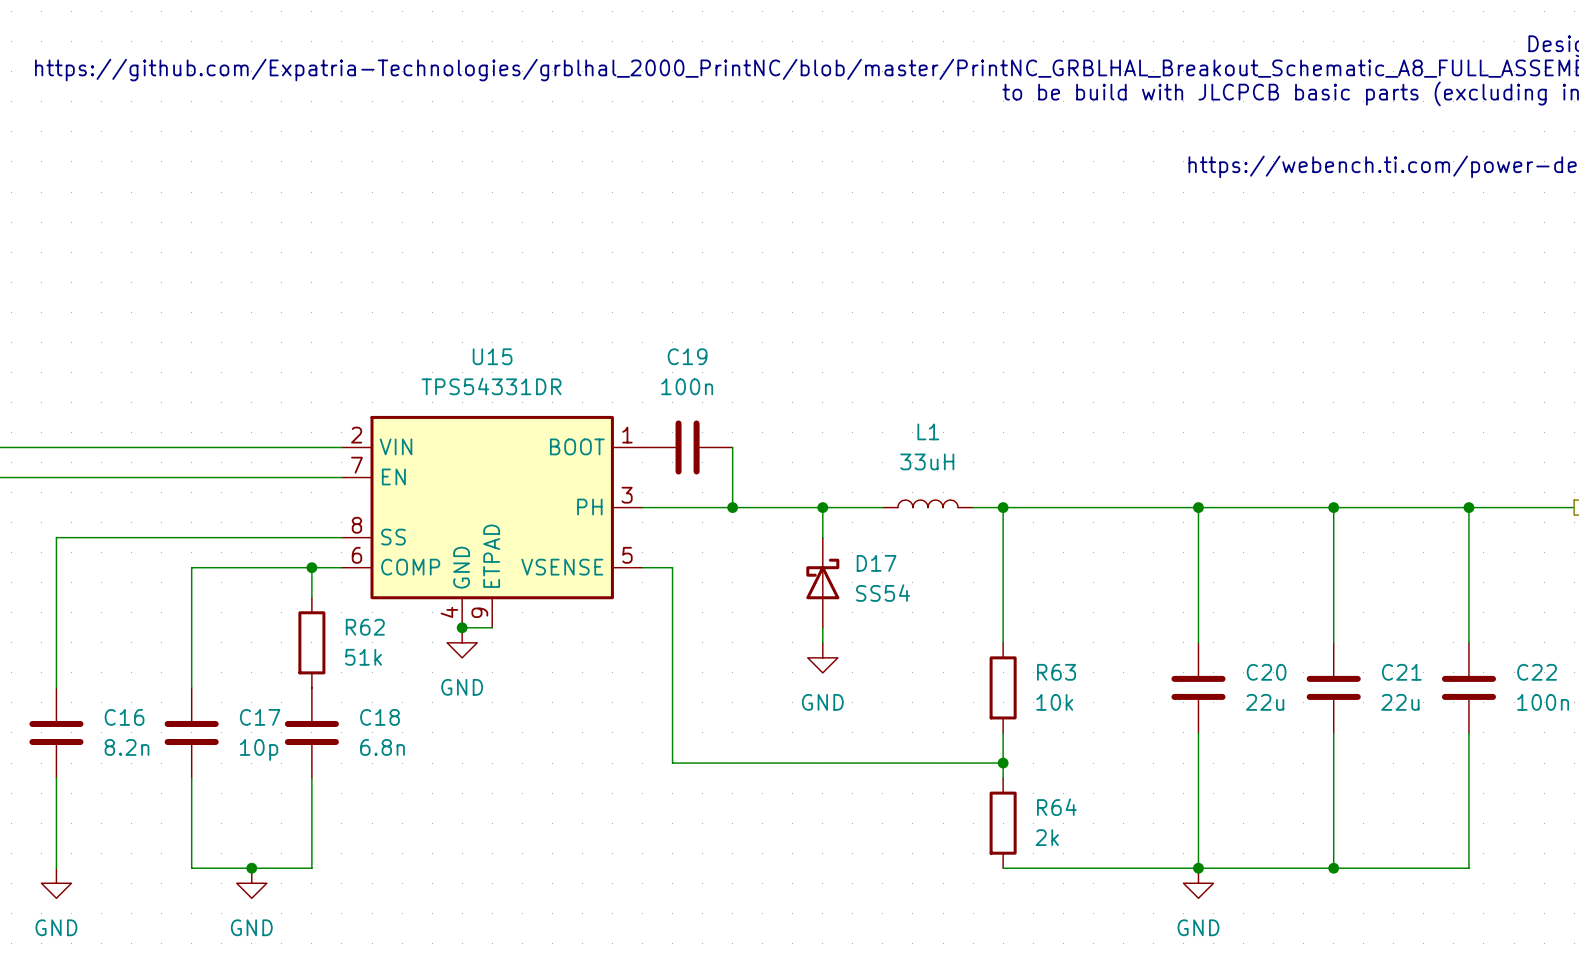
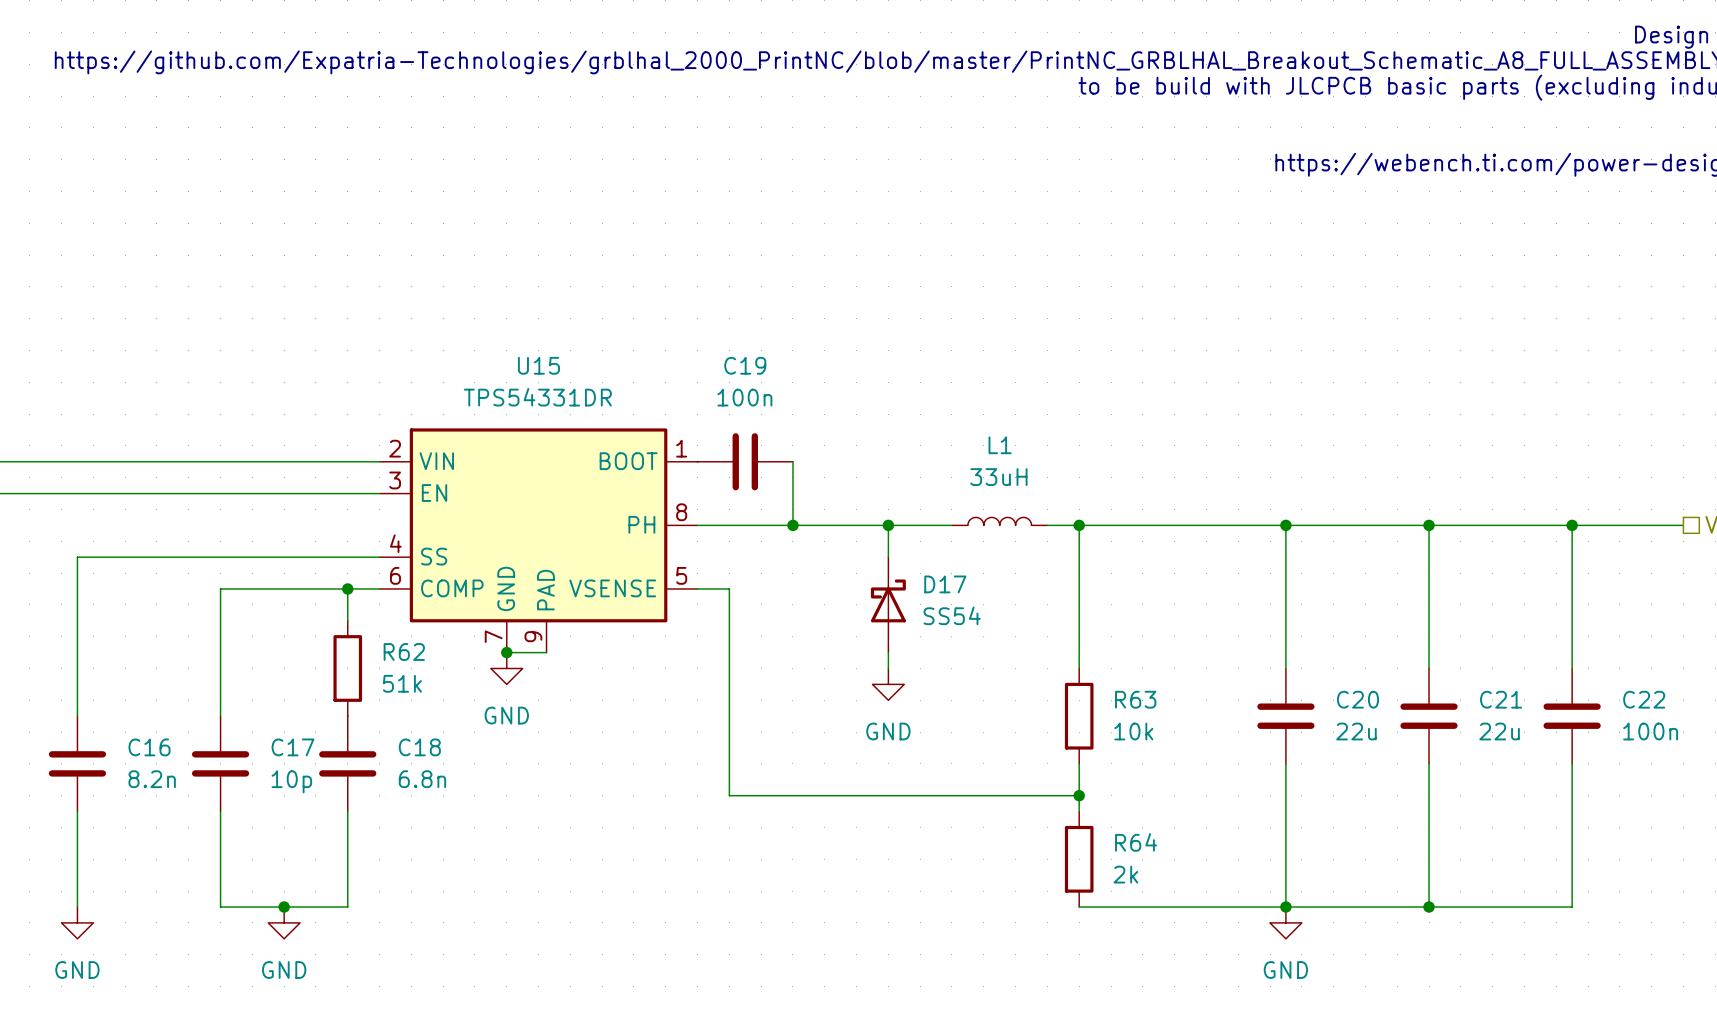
U15 symbol: [341, 415, 643, 628] -> [379, 428, 698, 653]
wire: none -> (538, 652) (546, 652)

